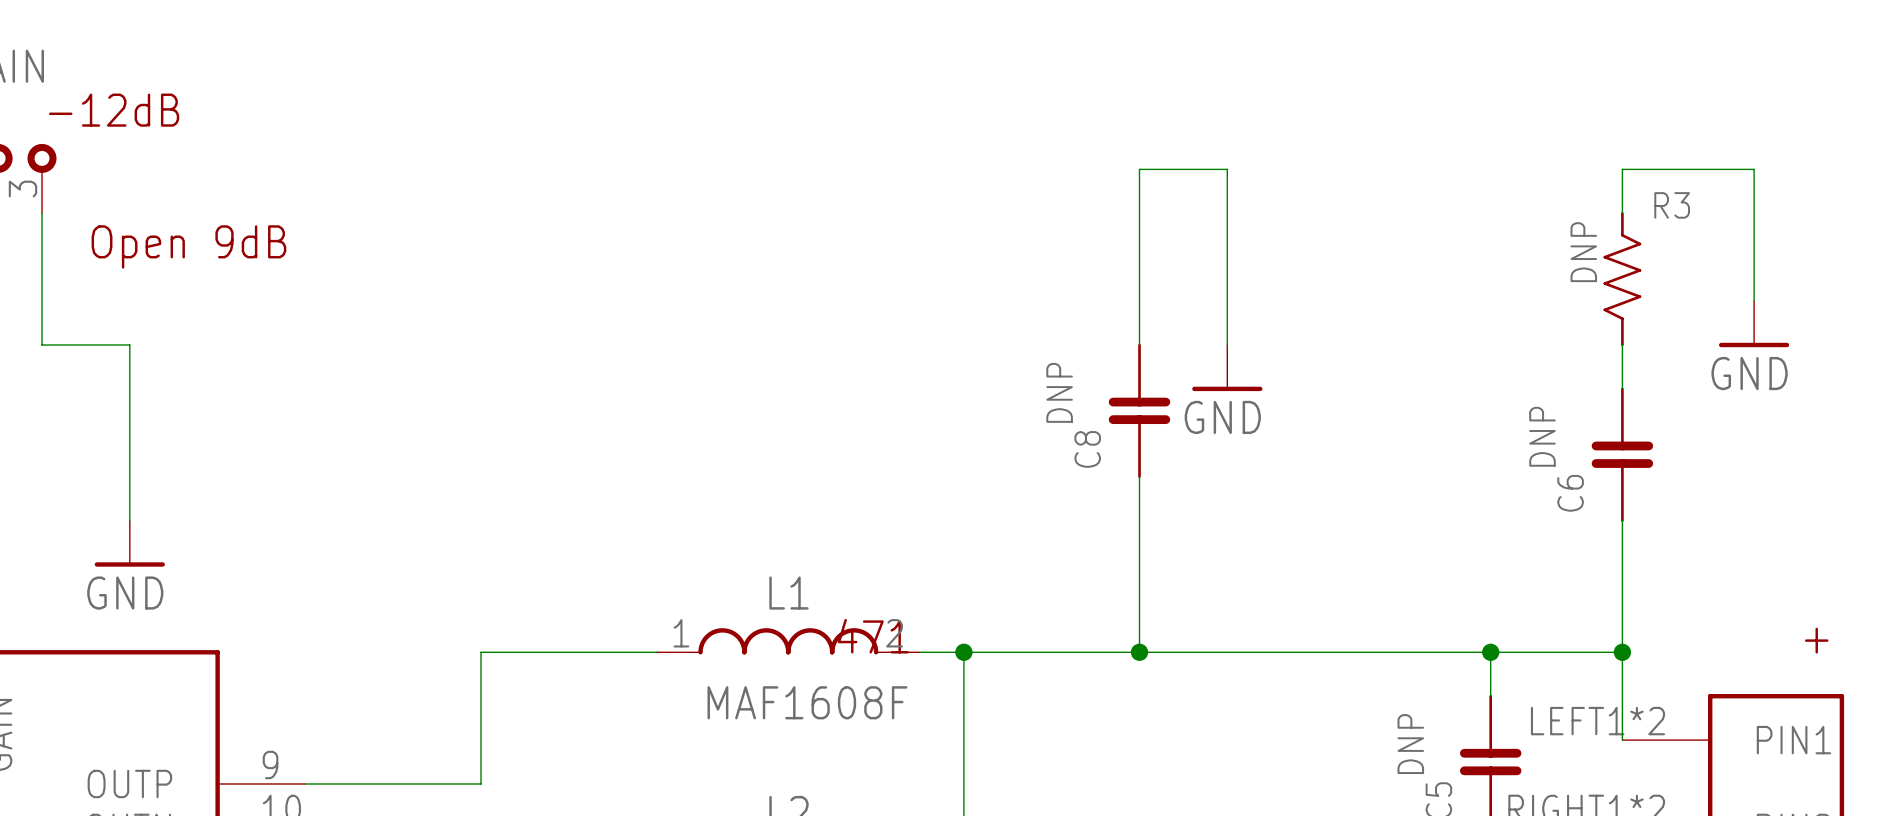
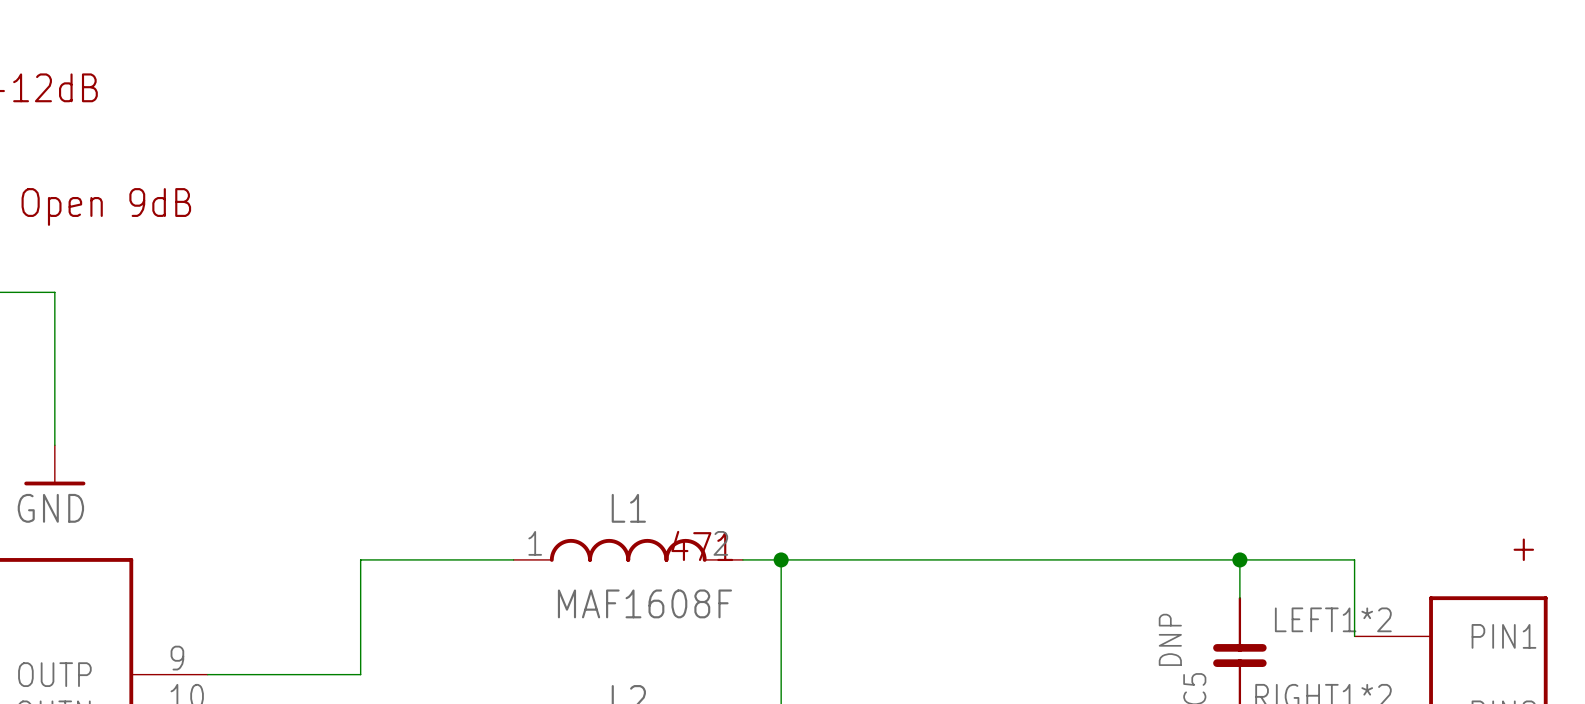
wire: (1622, 213) (1622, 169) (1754, 169) (1754, 301) -> none
R3: DNP (1622, 279) -> none
power symbol: GND (1754, 324) -> none
wire: (1139, 345) (1139, 169) (1227, 169) (1227, 345) -> none
wire: (1622, 345) (1622, 388) -> none
power symbol: GND (1227, 368) -> none
C8: DNP (1139, 410) -> none
C6: DNP (1622, 454) -> none
wire: (1139, 476) (1139, 652) -> none
wire: (1622, 520) (1622, 652) -> none
junction: (1139, 652) -> none
junction: (1622, 652) -> none

